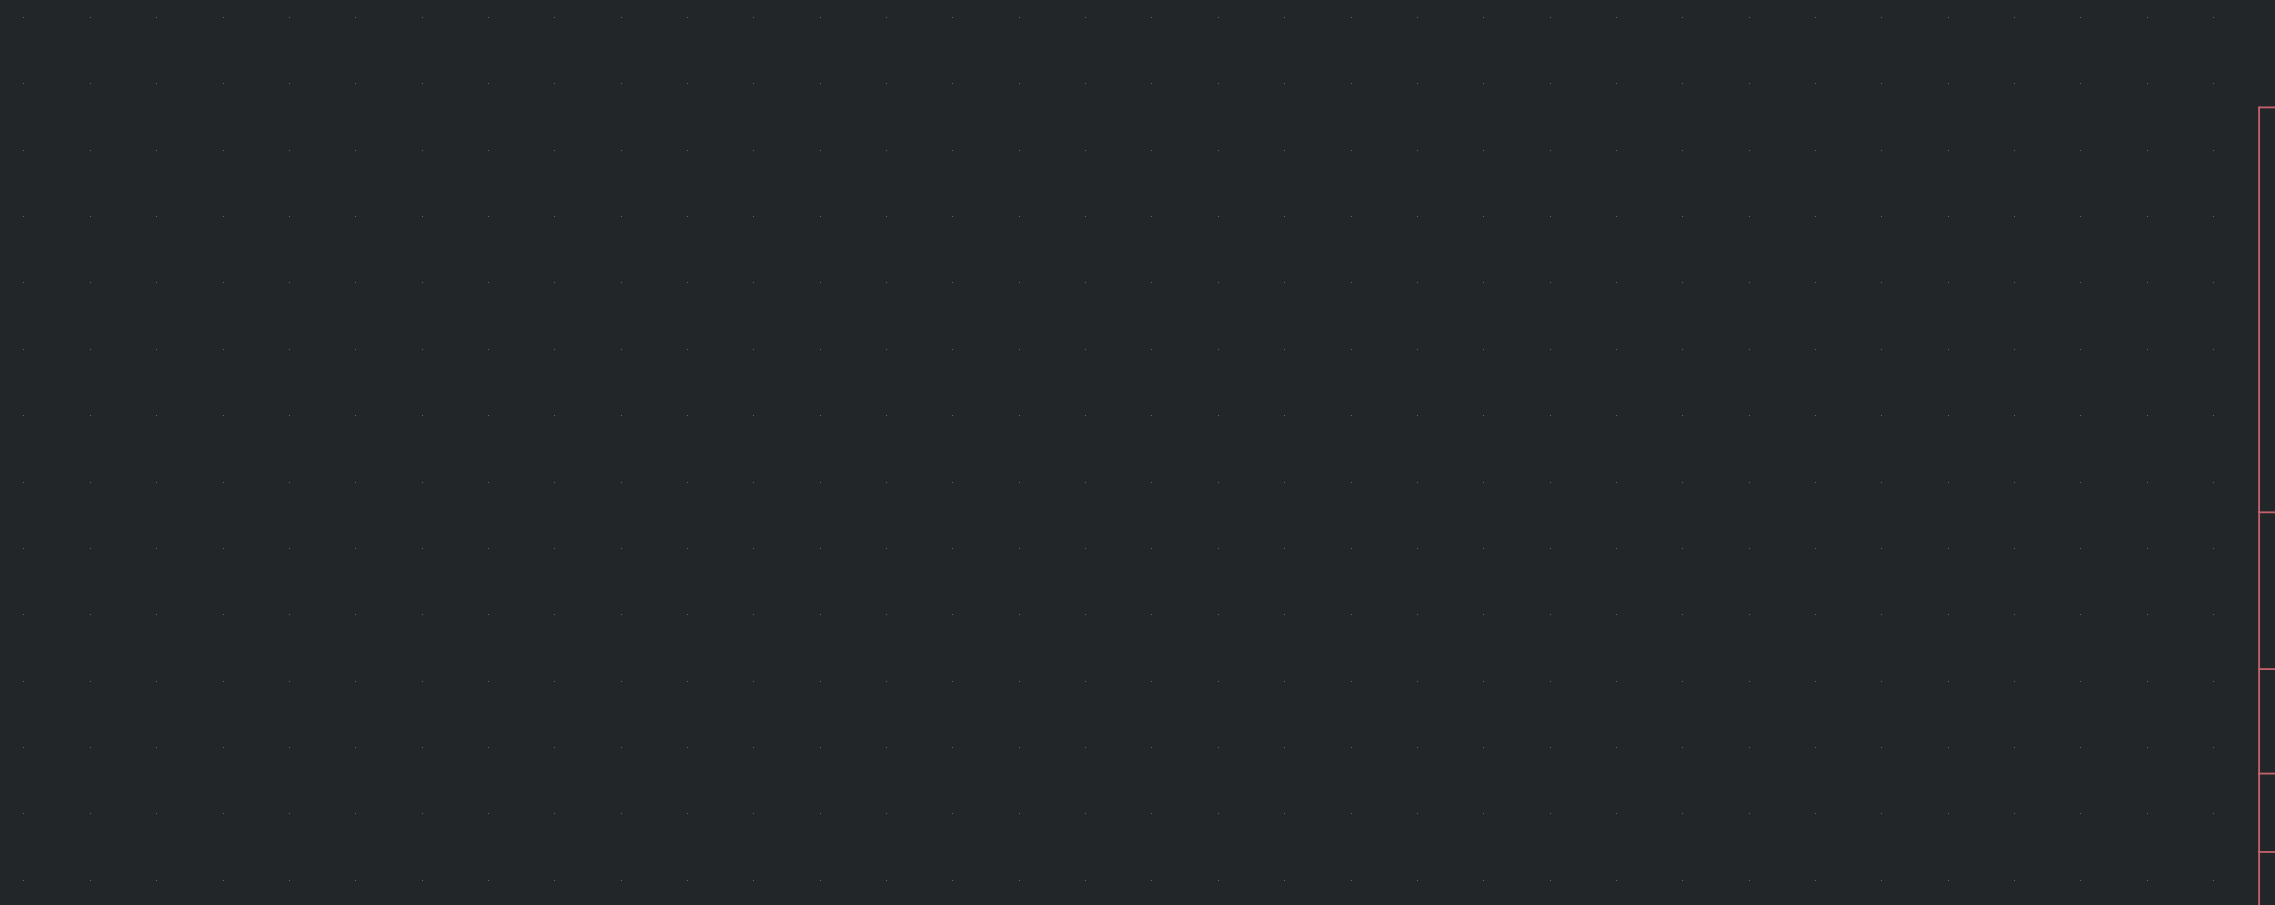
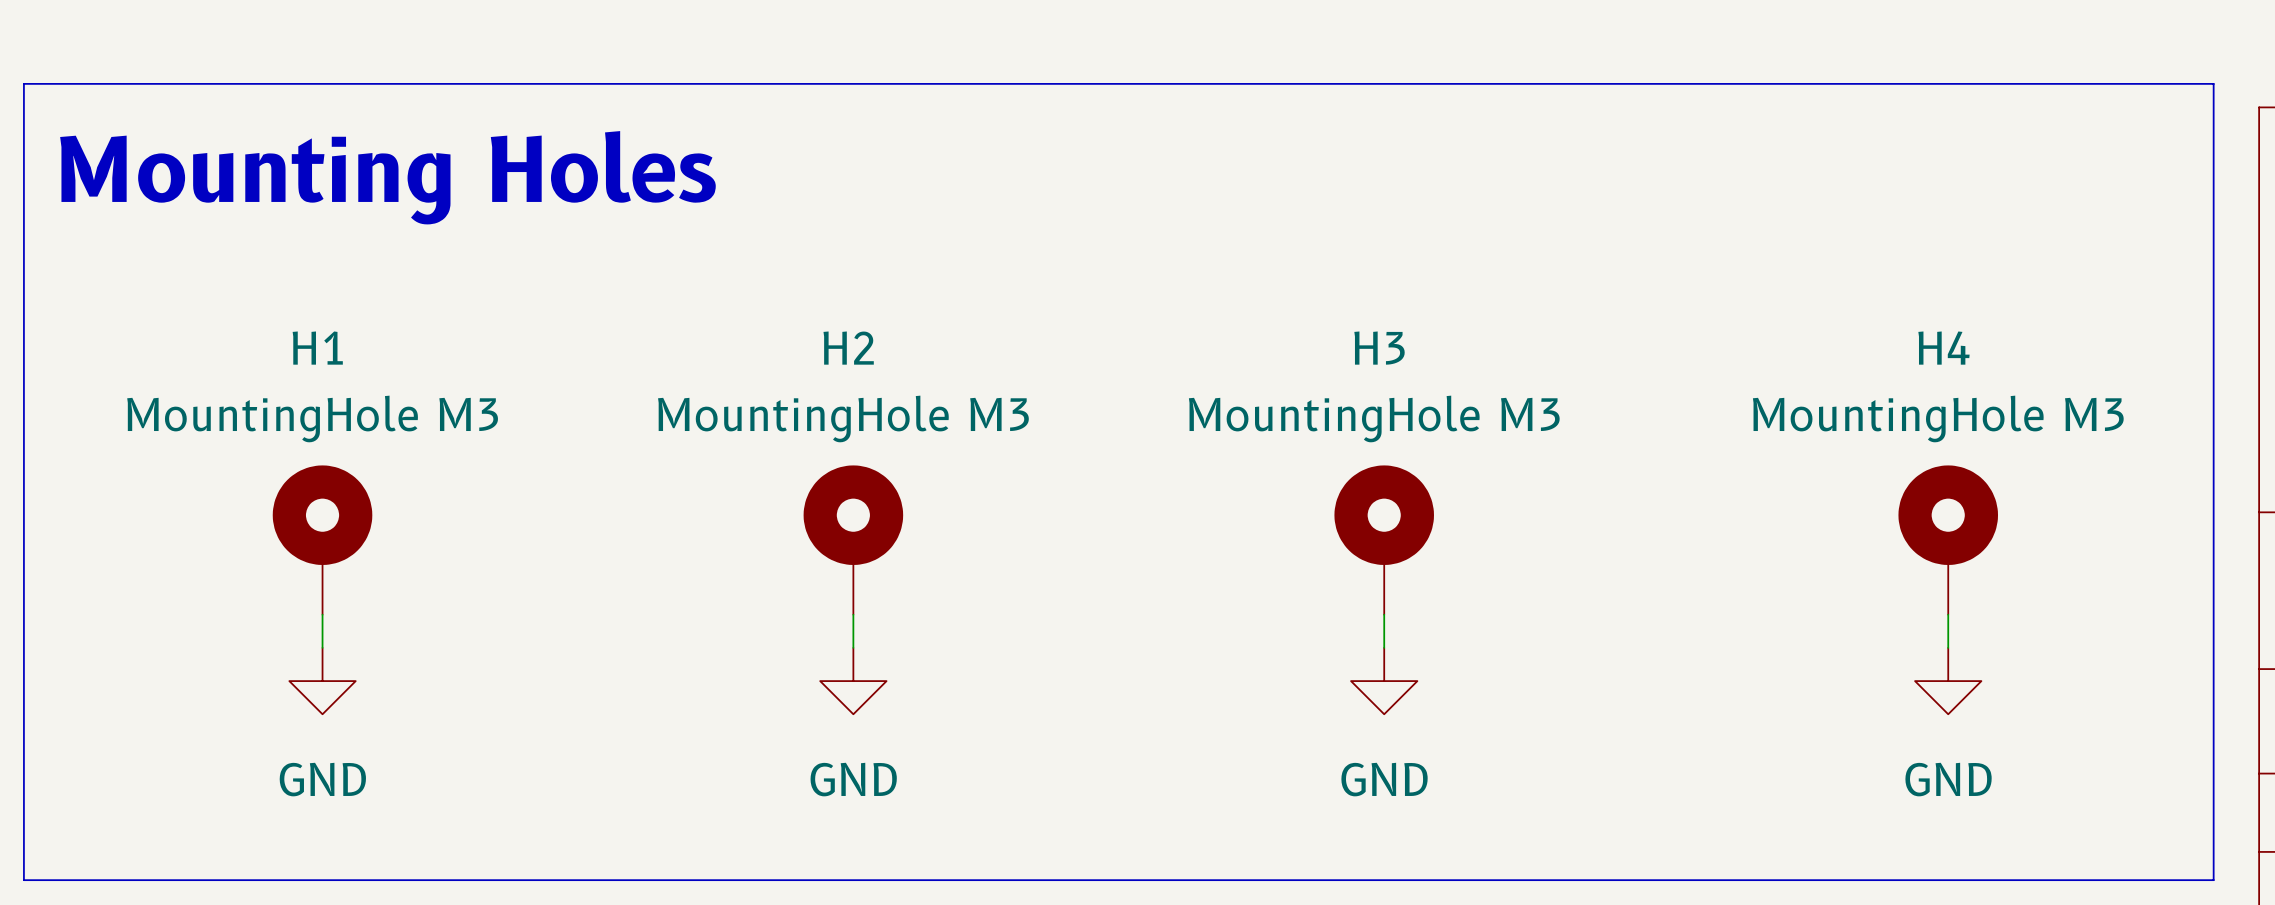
line: none -> (23, 83) (2213, 83) (2213, 880) (23, 880) (23, 83)
text: none -> Mounting Holes (387, 177)
H1: none -> MountingHole M3 (322, 540)
H2: none -> MountingHole M3 (853, 540)
H3: none -> MountingHole M3 (1384, 540)
H4: none -> MountingHole M3 (1948, 540)
wire: none -> (322, 614) (322, 647)
wire: none -> (853, 614) (853, 647)
wire: none -> (1384, 614) (1384, 647)
wire: none -> (1948, 614) (1948, 647)
power symbol: none -> GND (322, 681)
power symbol: none -> GND (853, 681)
power symbol: none -> GND (1384, 681)
power symbol: none -> GND (1948, 681)

